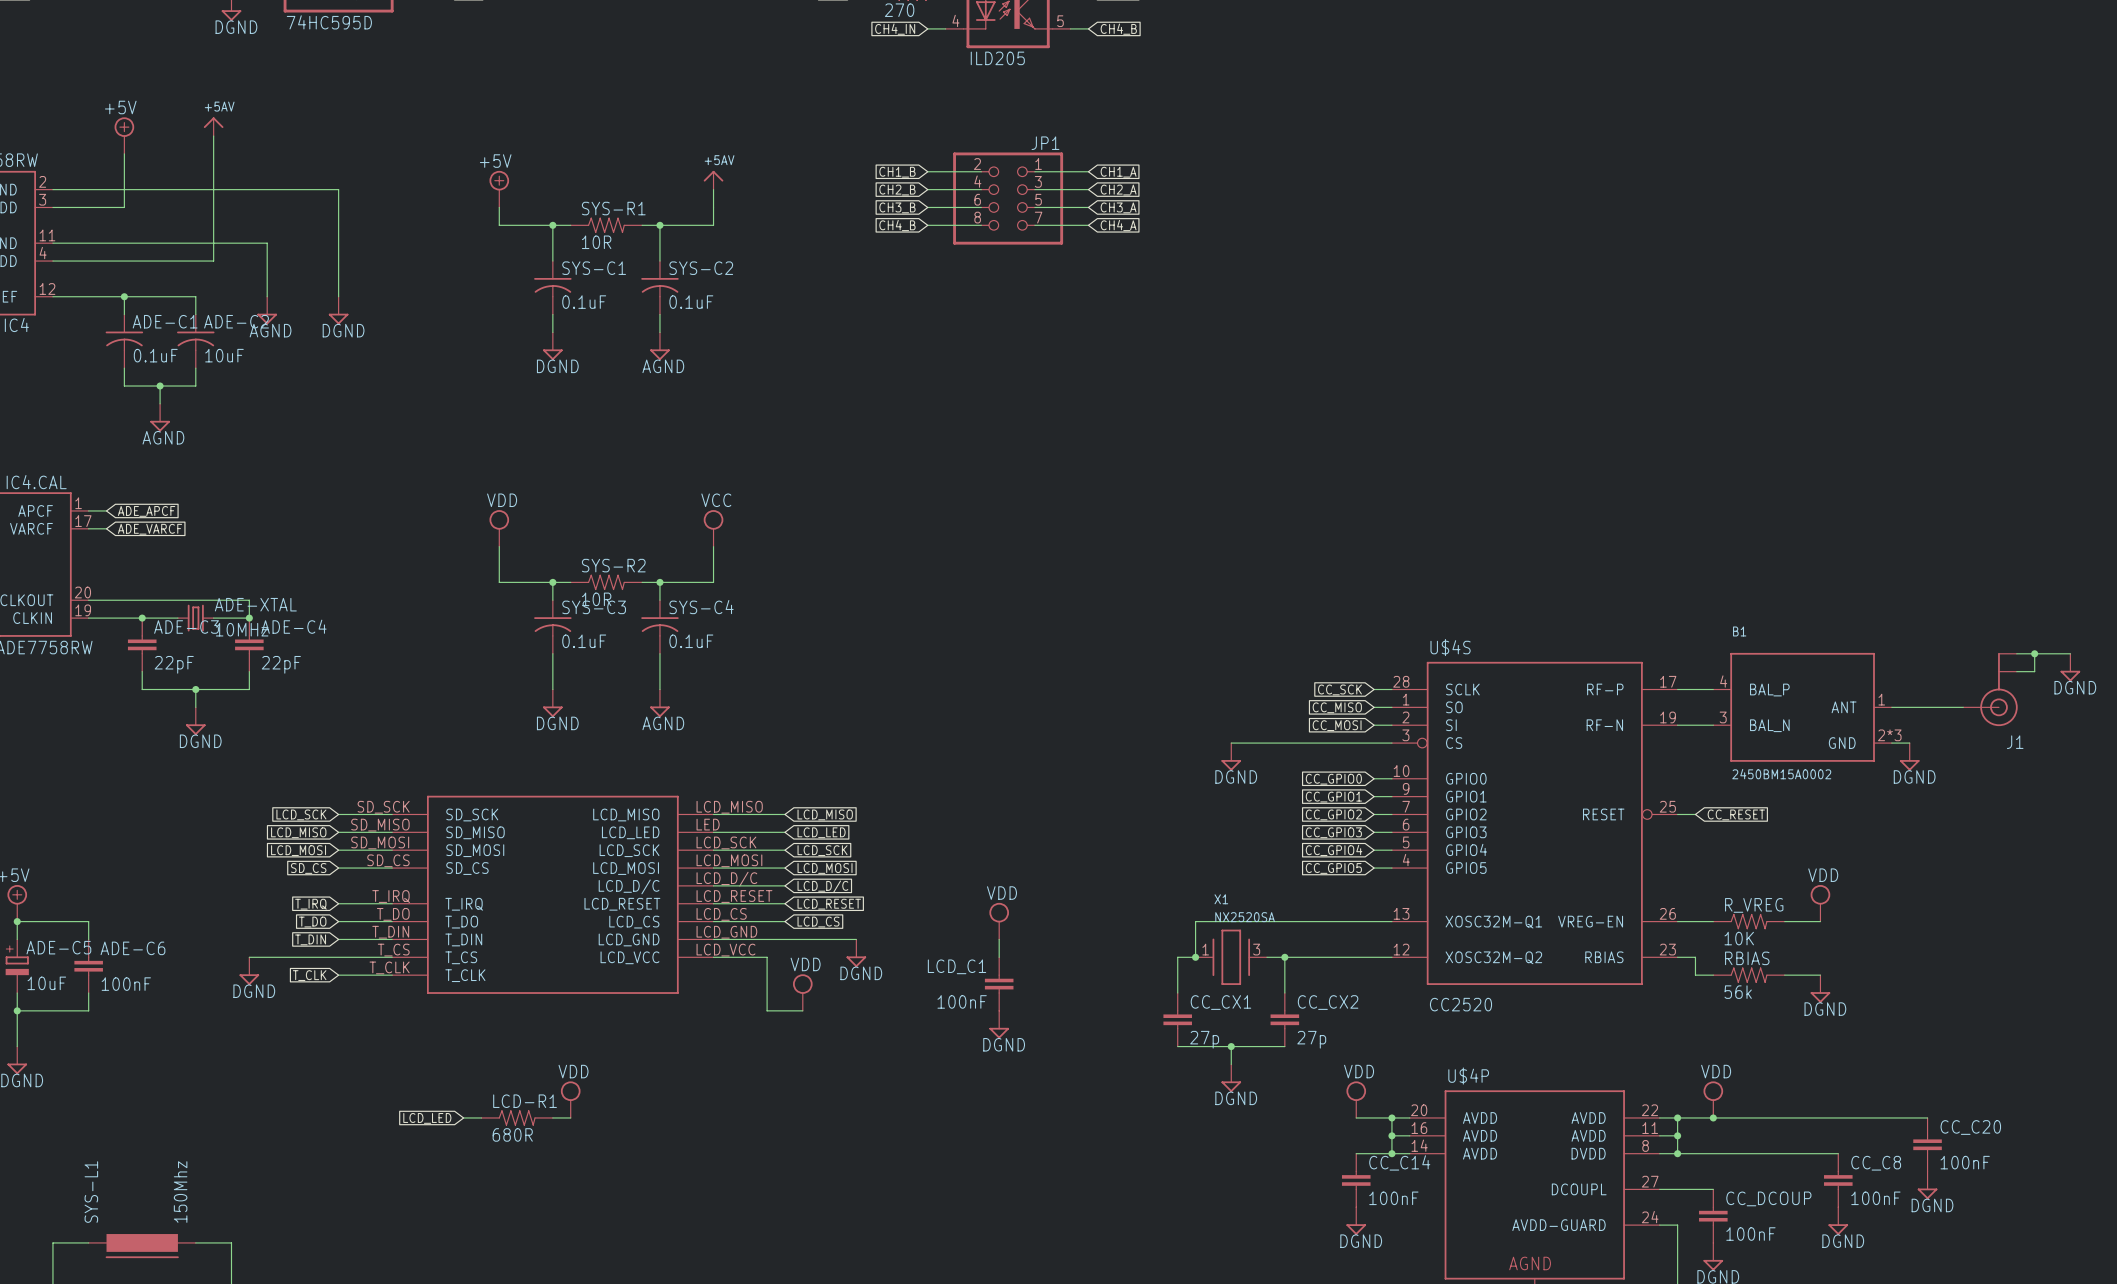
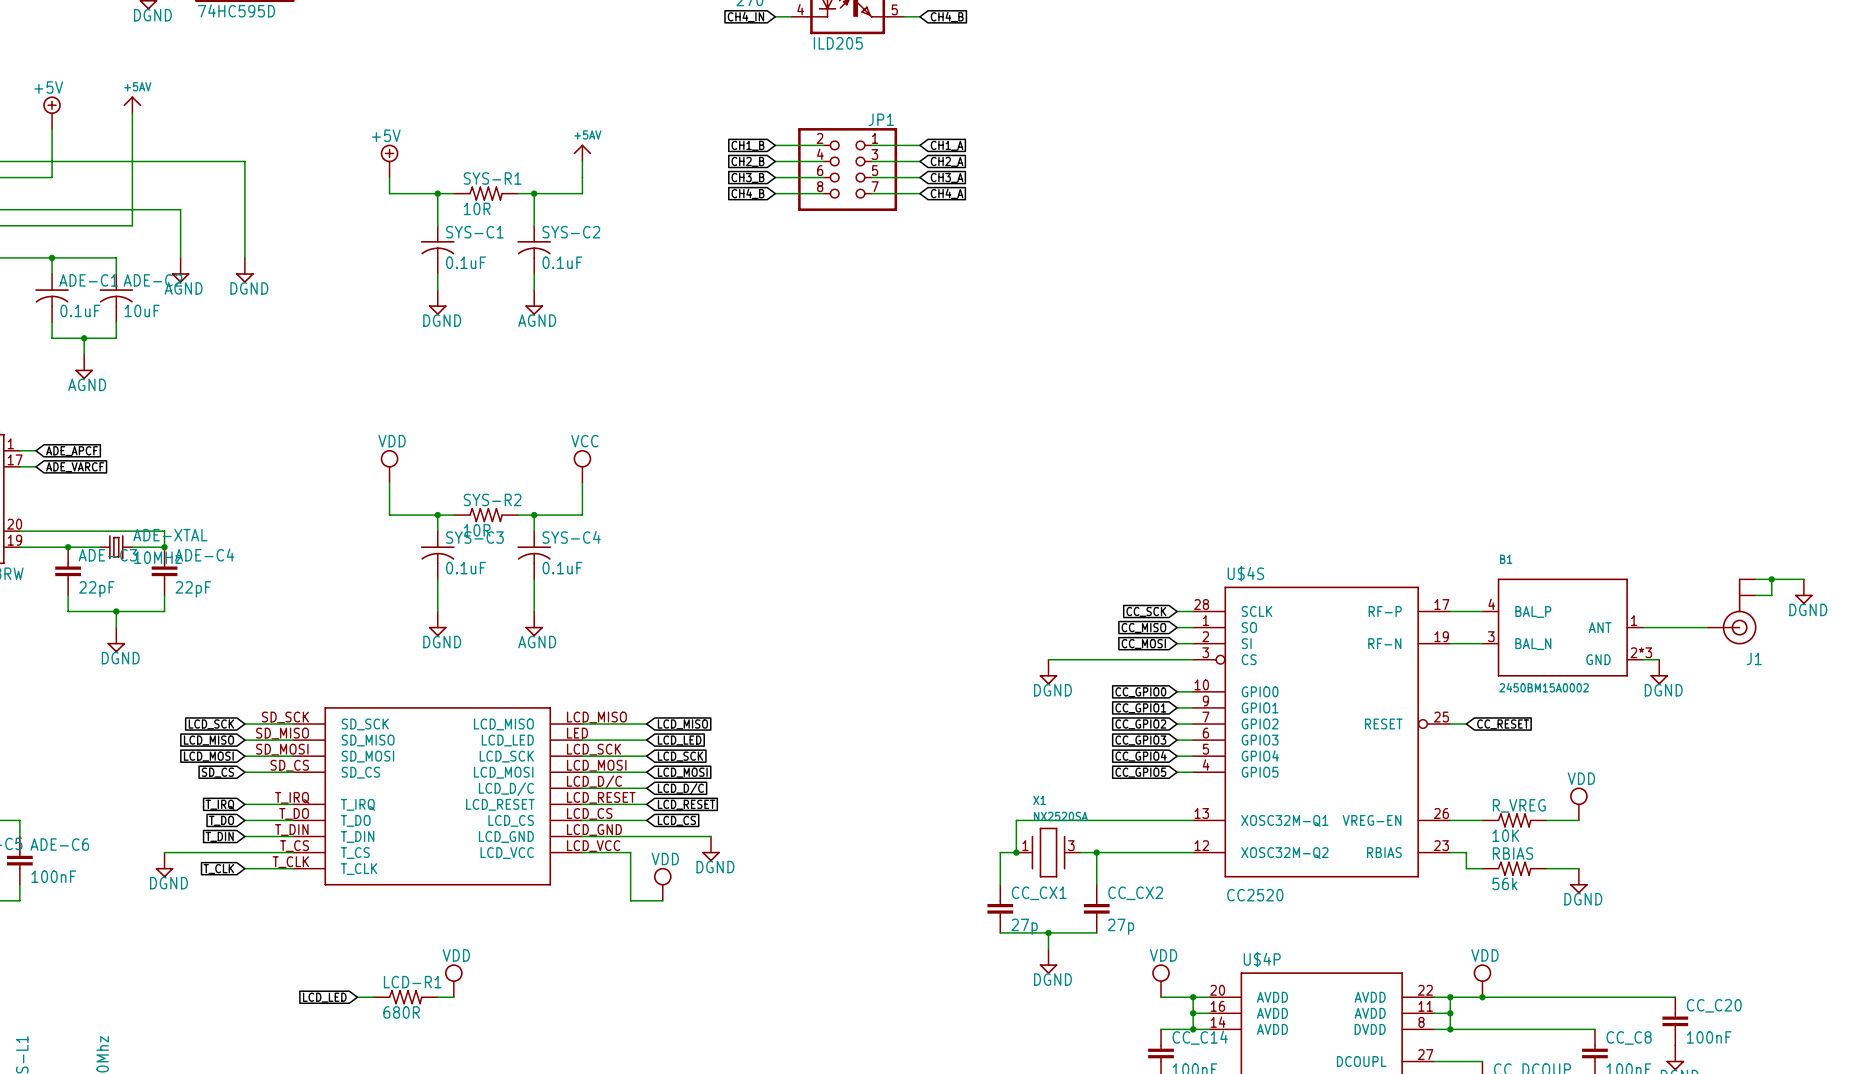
power symbol: VDD (999, 921) -> none
wire: (999, 939) (999, 957) -> none
LCD_C1: 100nF (999, 984) -> none
power symbol: DGND (999, 1024) -> none

